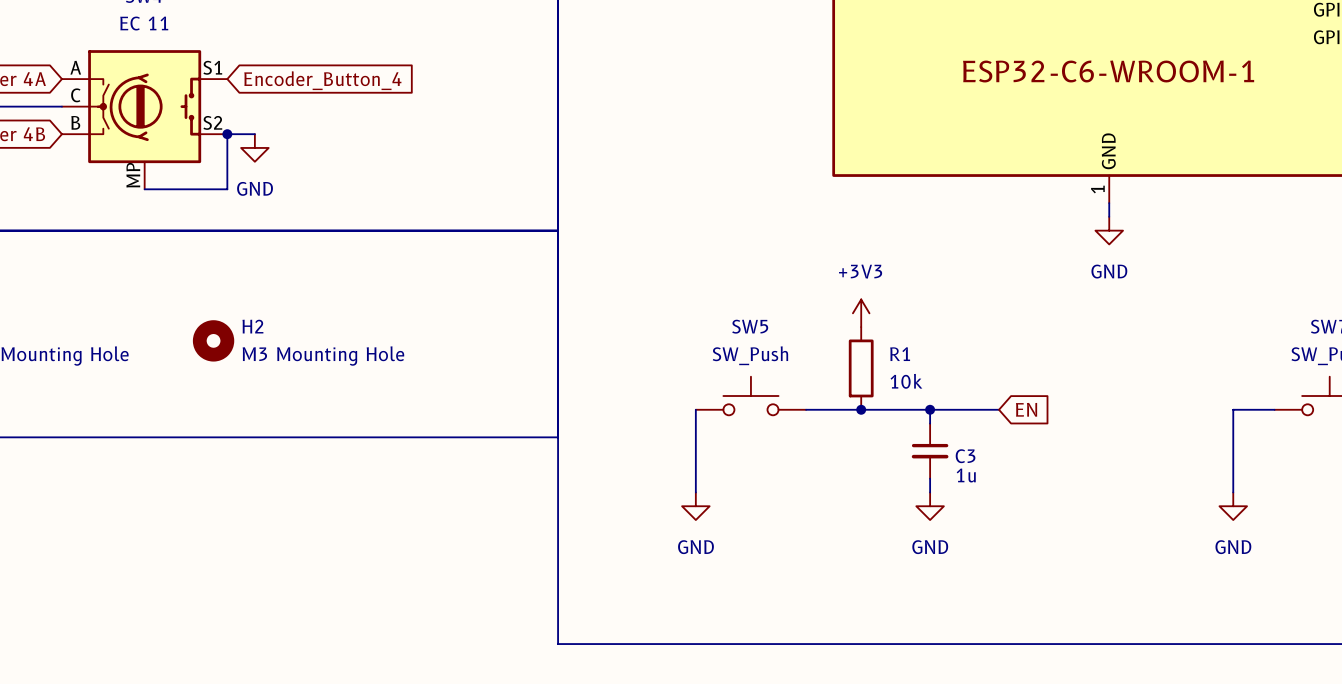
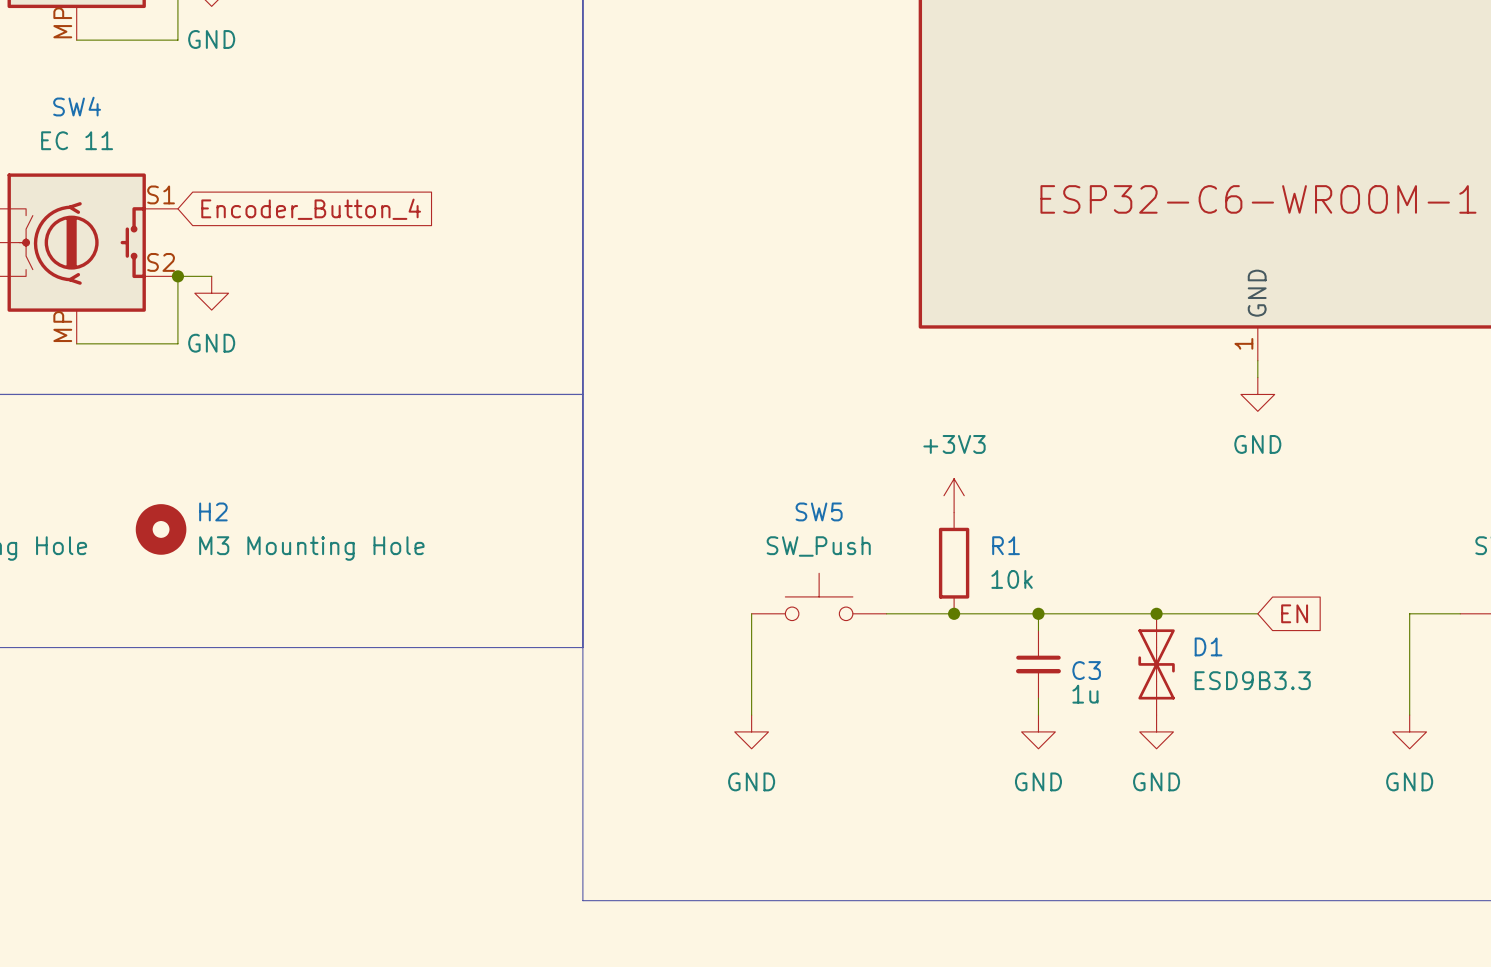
wire: none -> (1122, 613) (1257, 613)
global label position: EN (1026, 409) -> EN (1294, 613)
junction: none -> (1156, 613)
D1: none -> ESD9B3.3 (1156, 664)
power symbol: none -> GND (1156, 731)

